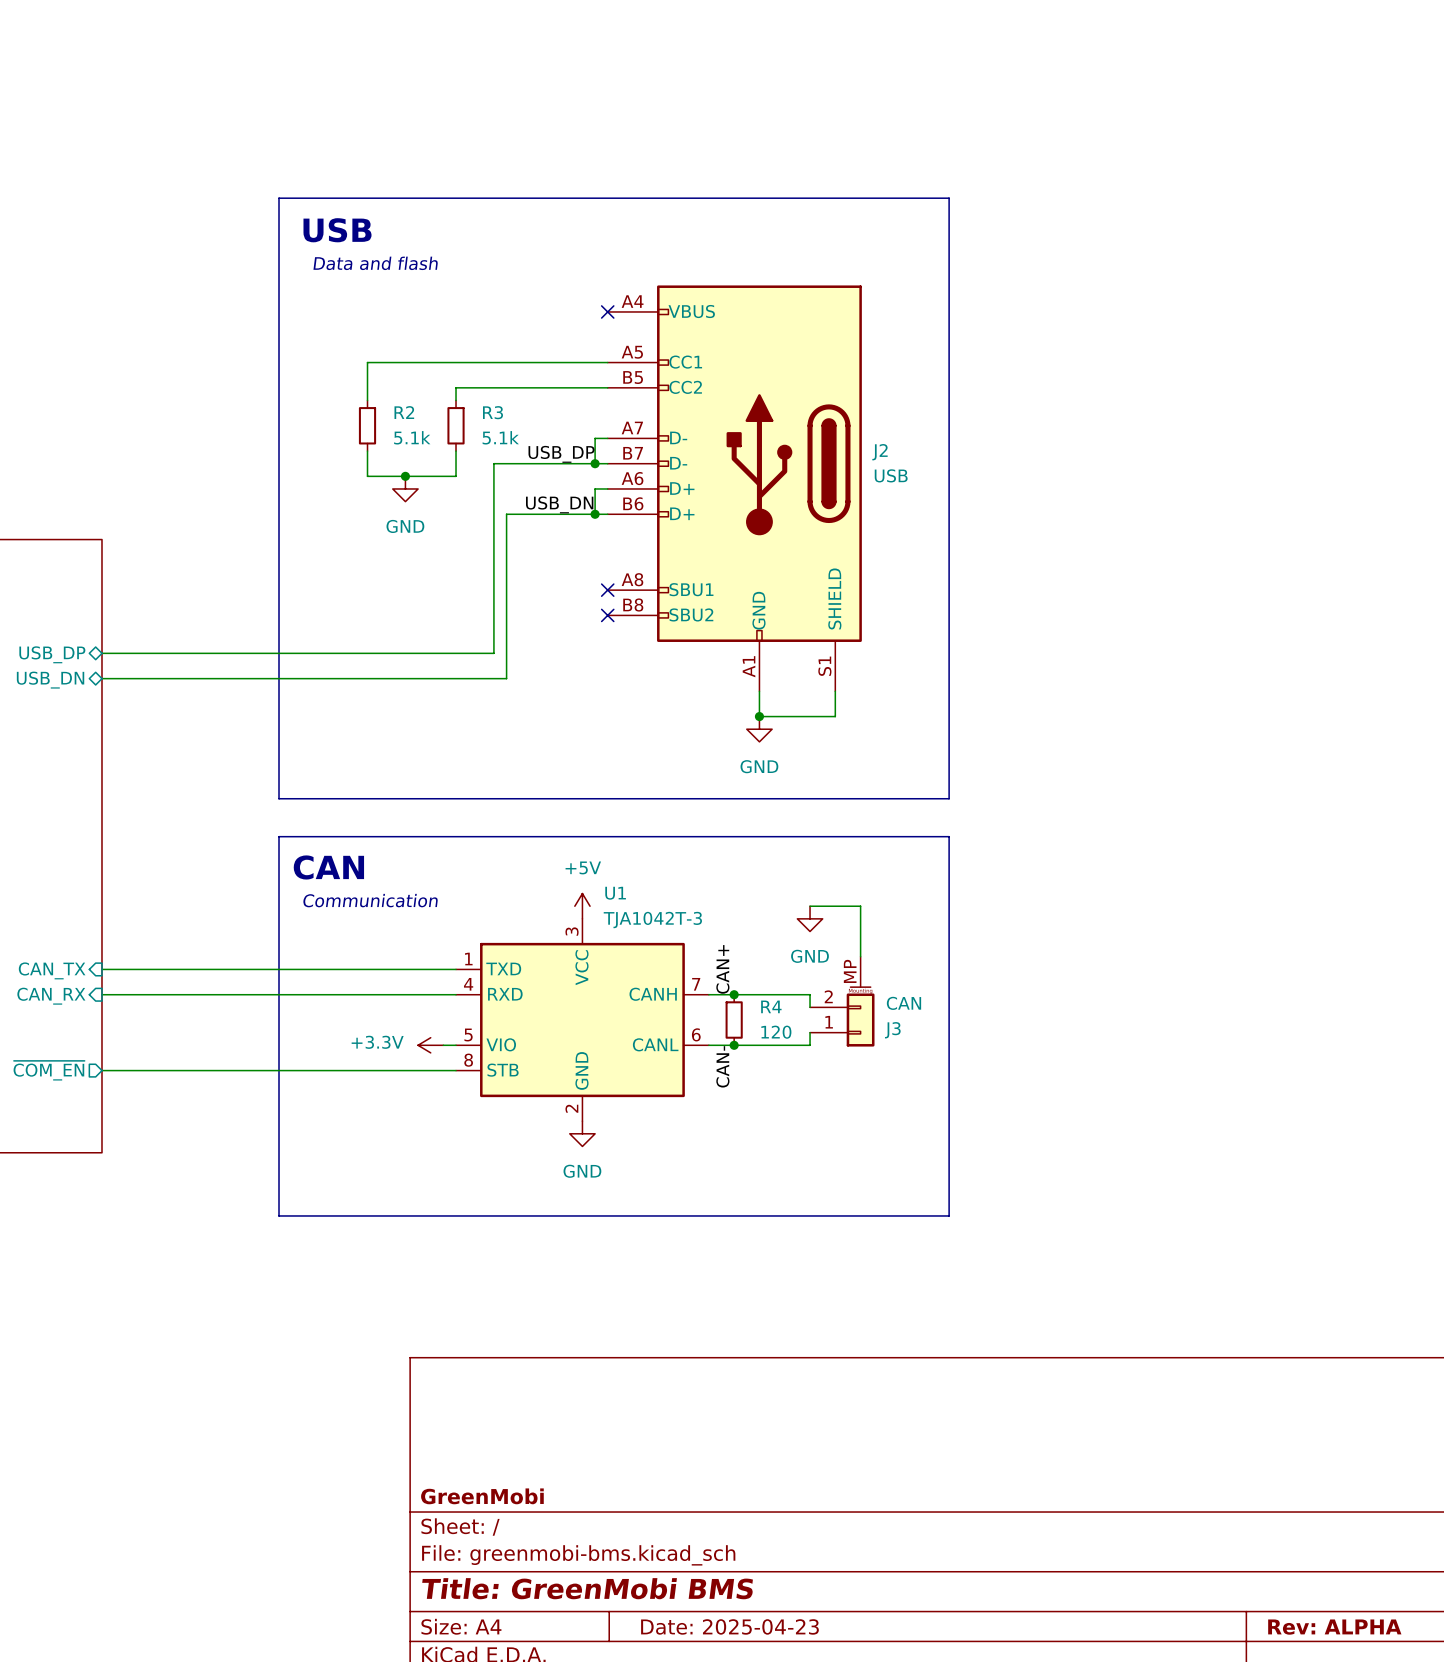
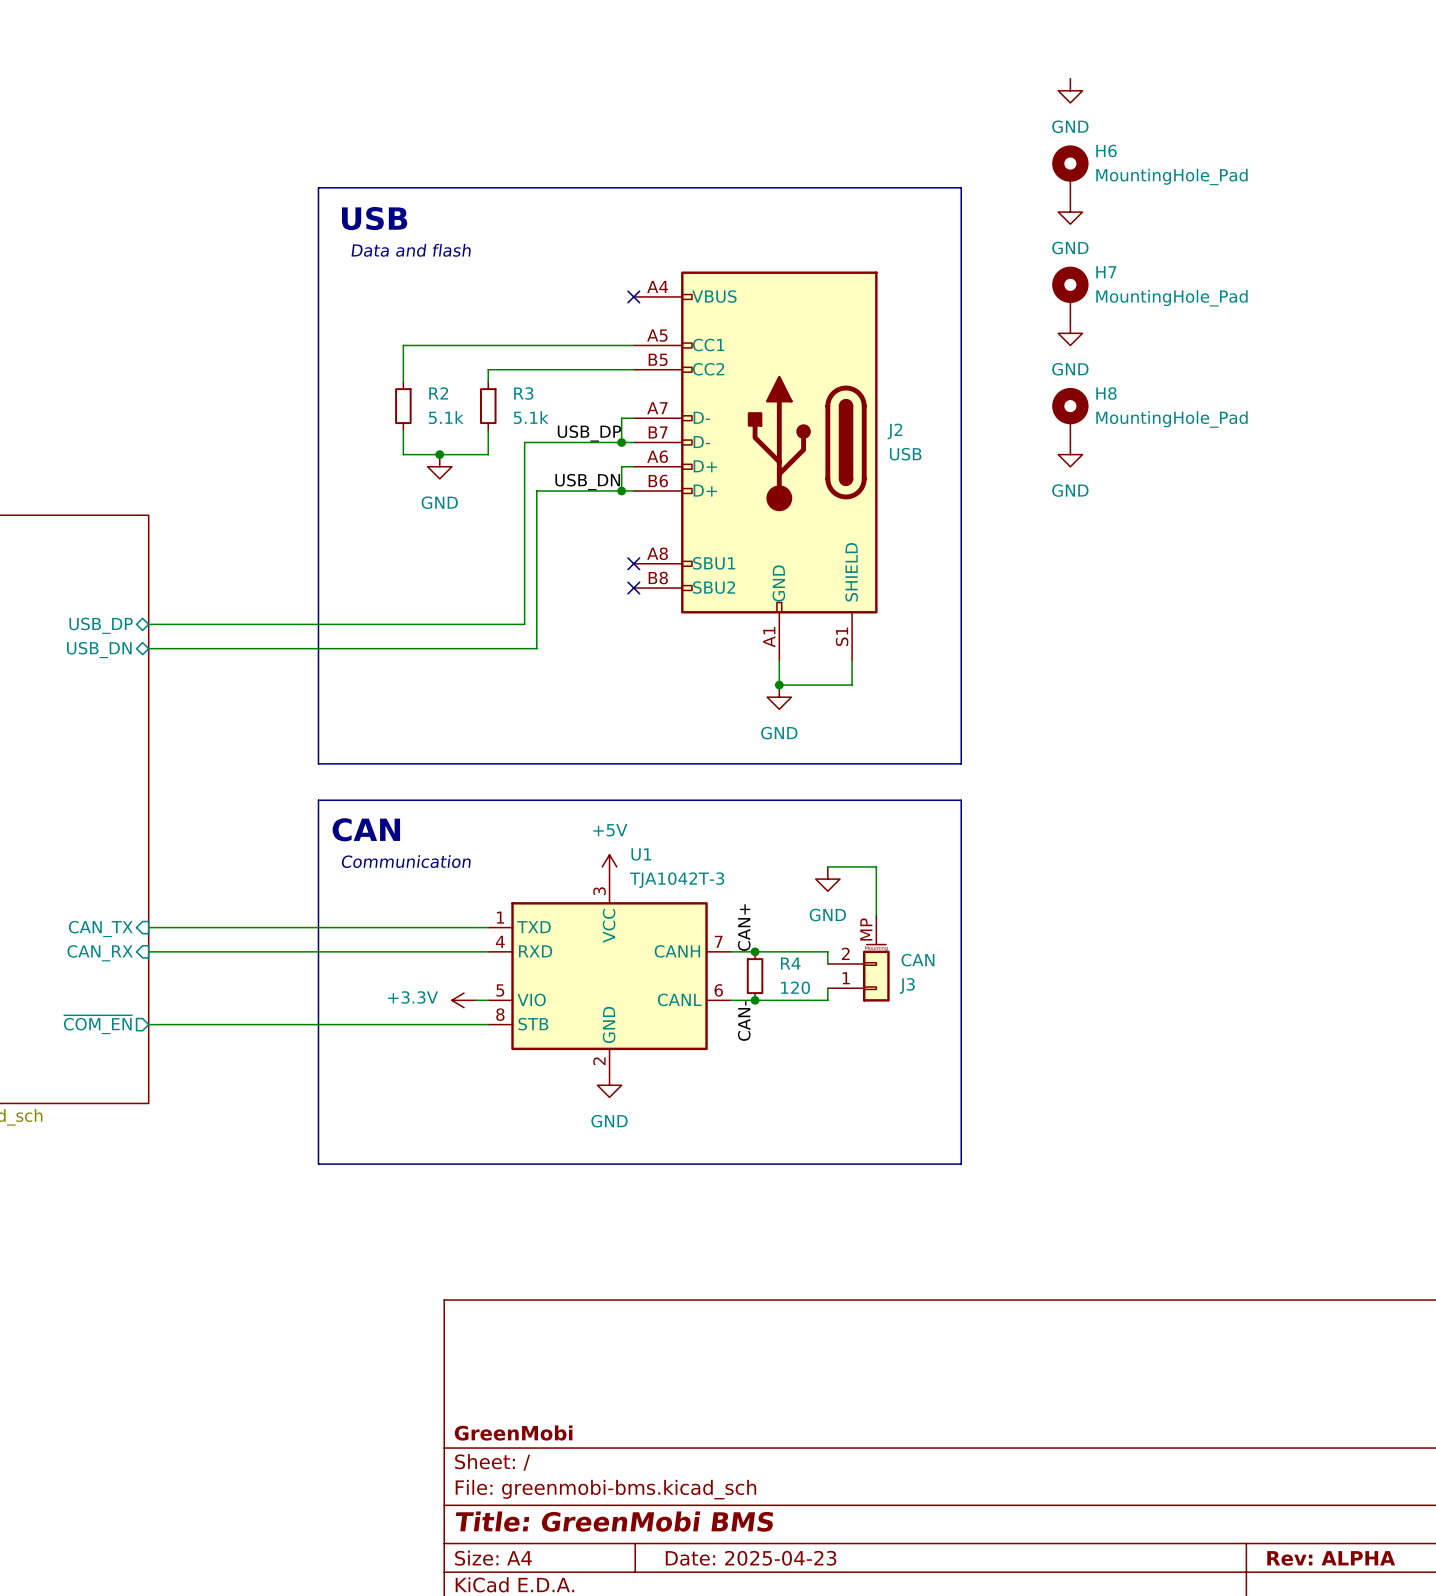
power symbol: none -> GND (1070, 90)
H6: none -> MountingHole_Pad (1070, 172)
power symbol: none -> GND (1070, 212)
H7: none -> MountingHole_Pad (1070, 293)
power symbol: none -> GND (1070, 333)
H8: none -> MountingHole_Pad (1070, 415)
power symbol: none -> GND (1070, 454)

